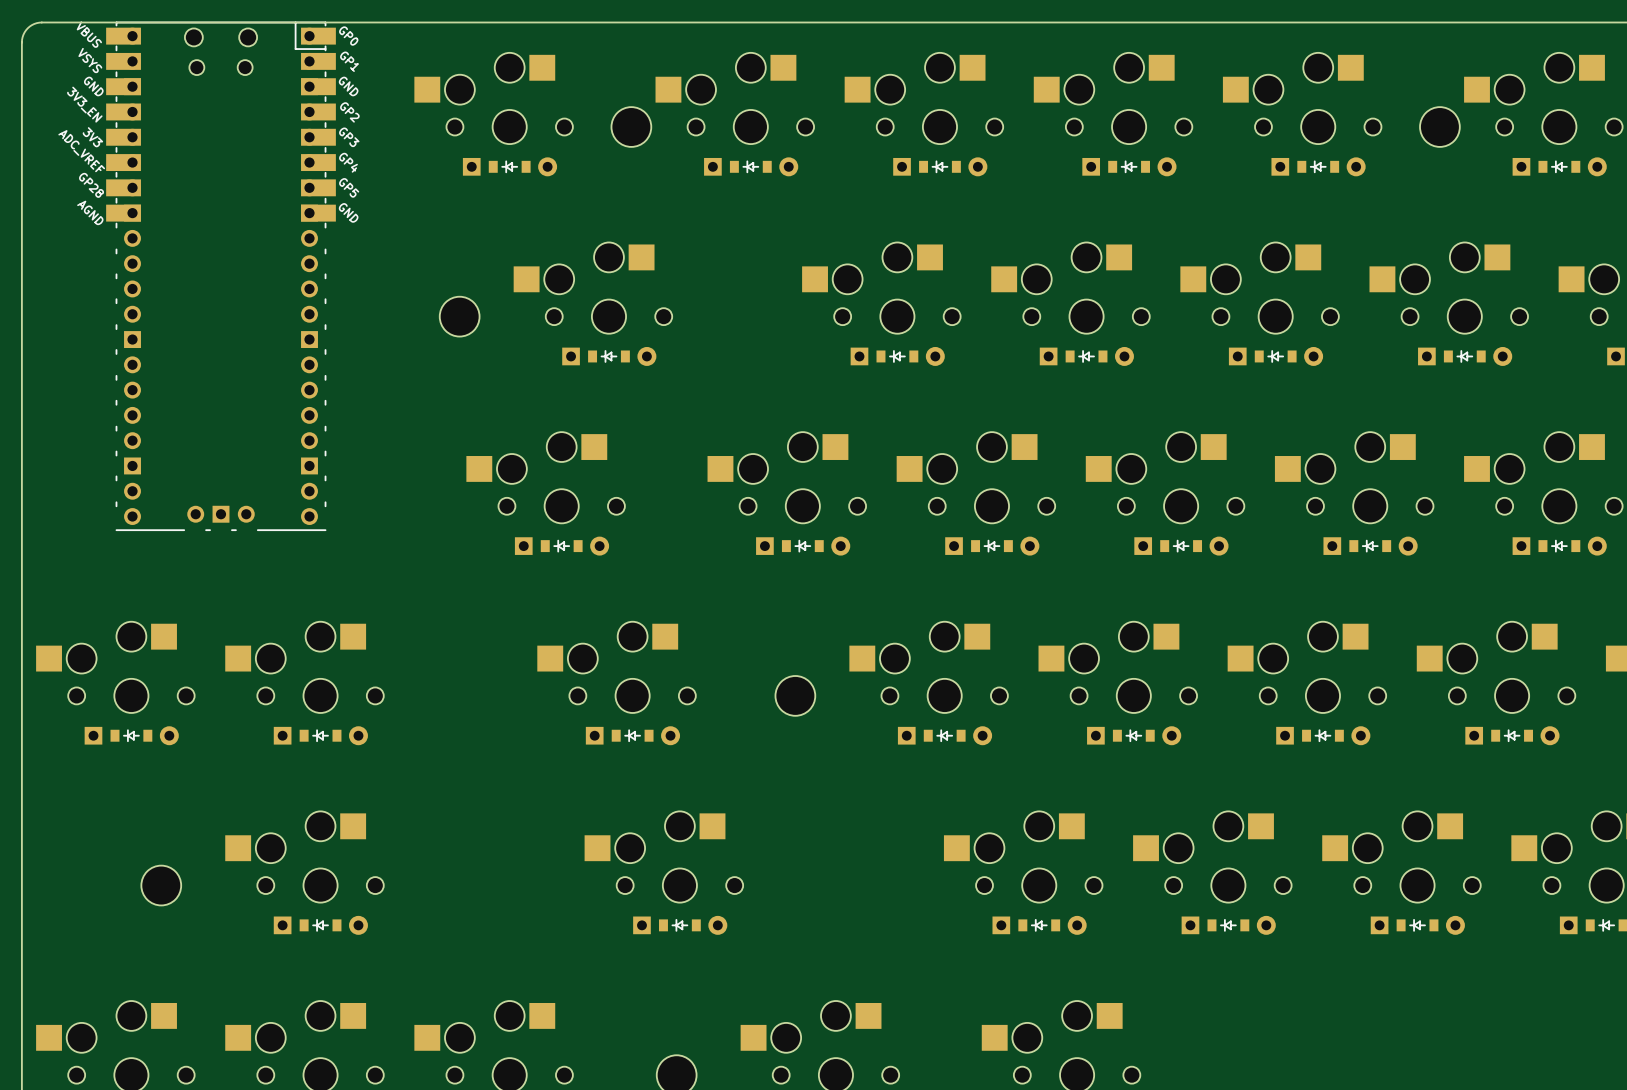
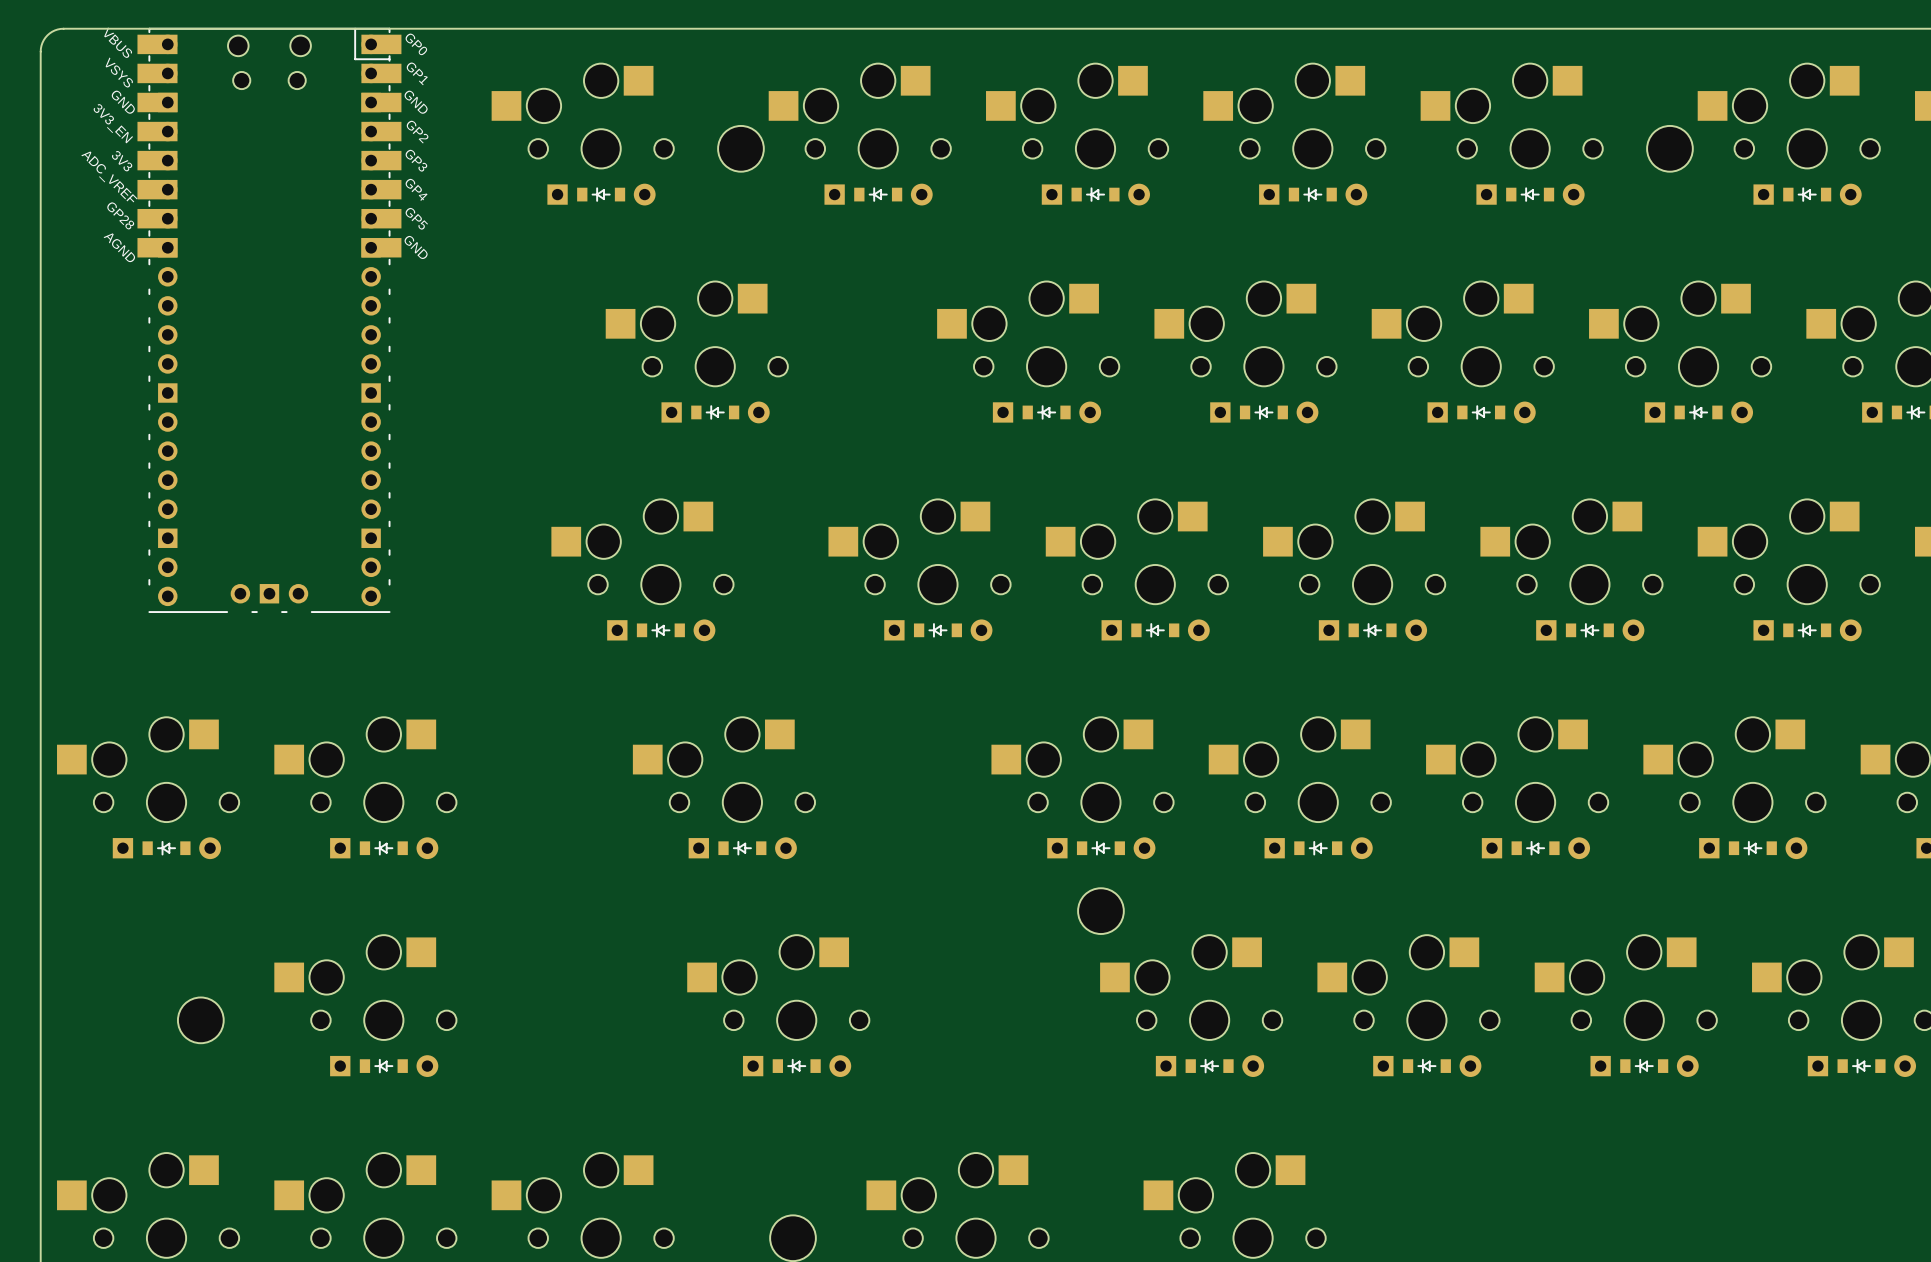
part: (459, 316) -> none
part position: (795, 695) -> (1100, 911)

